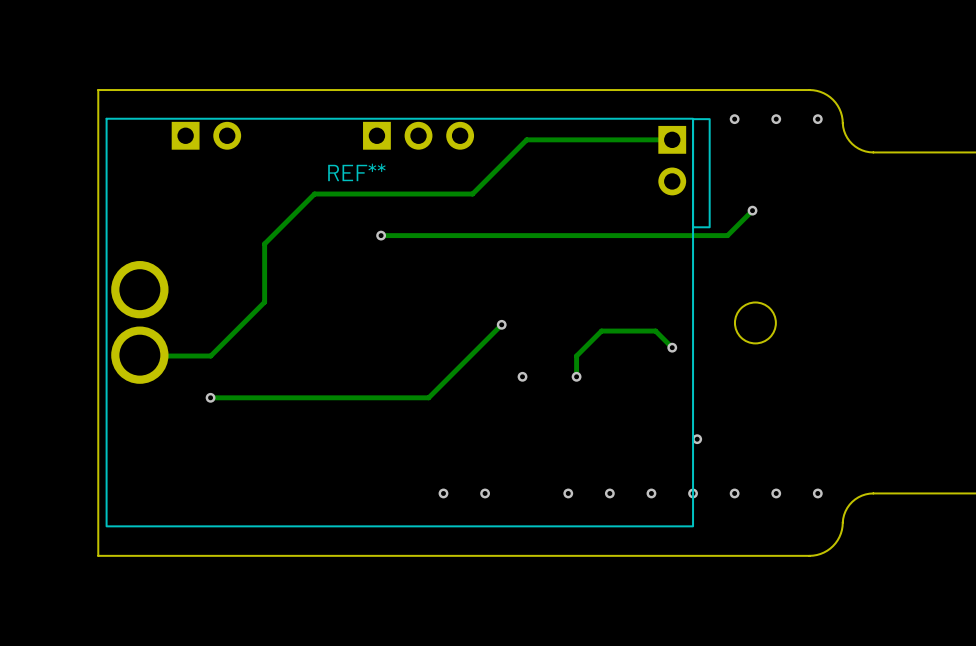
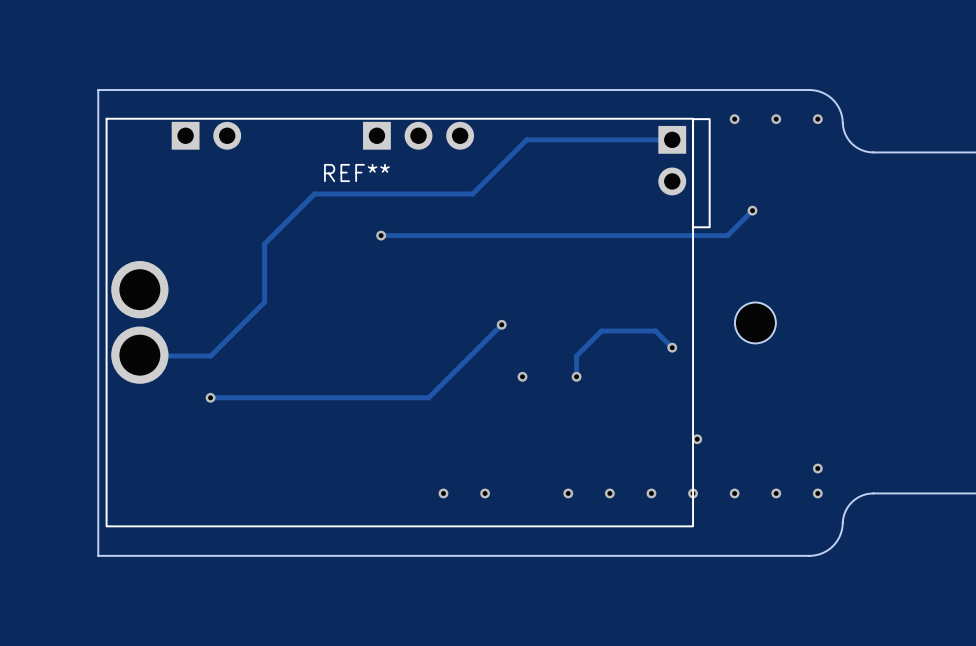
via: none -> (817, 468)

